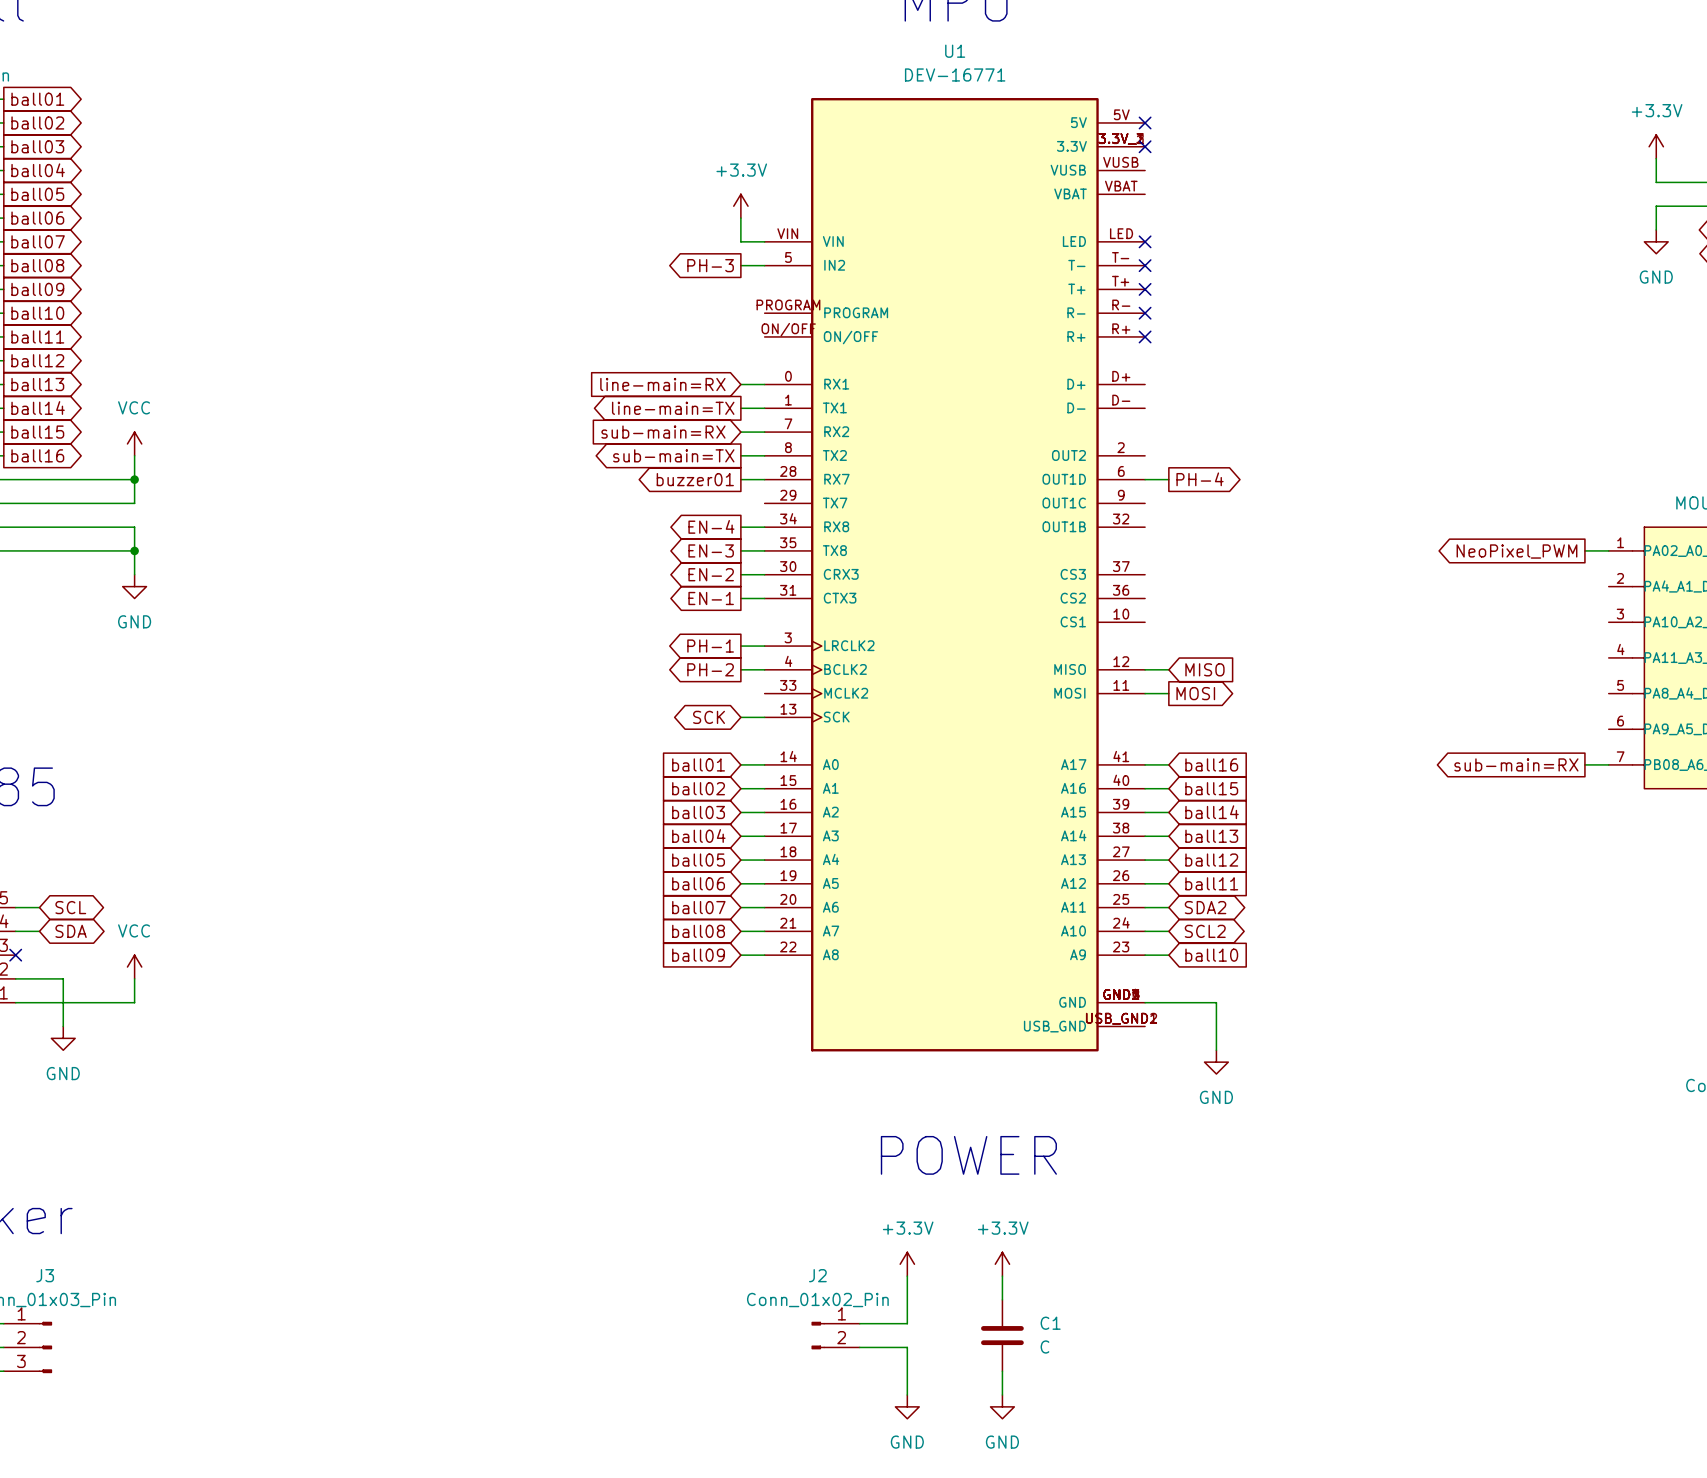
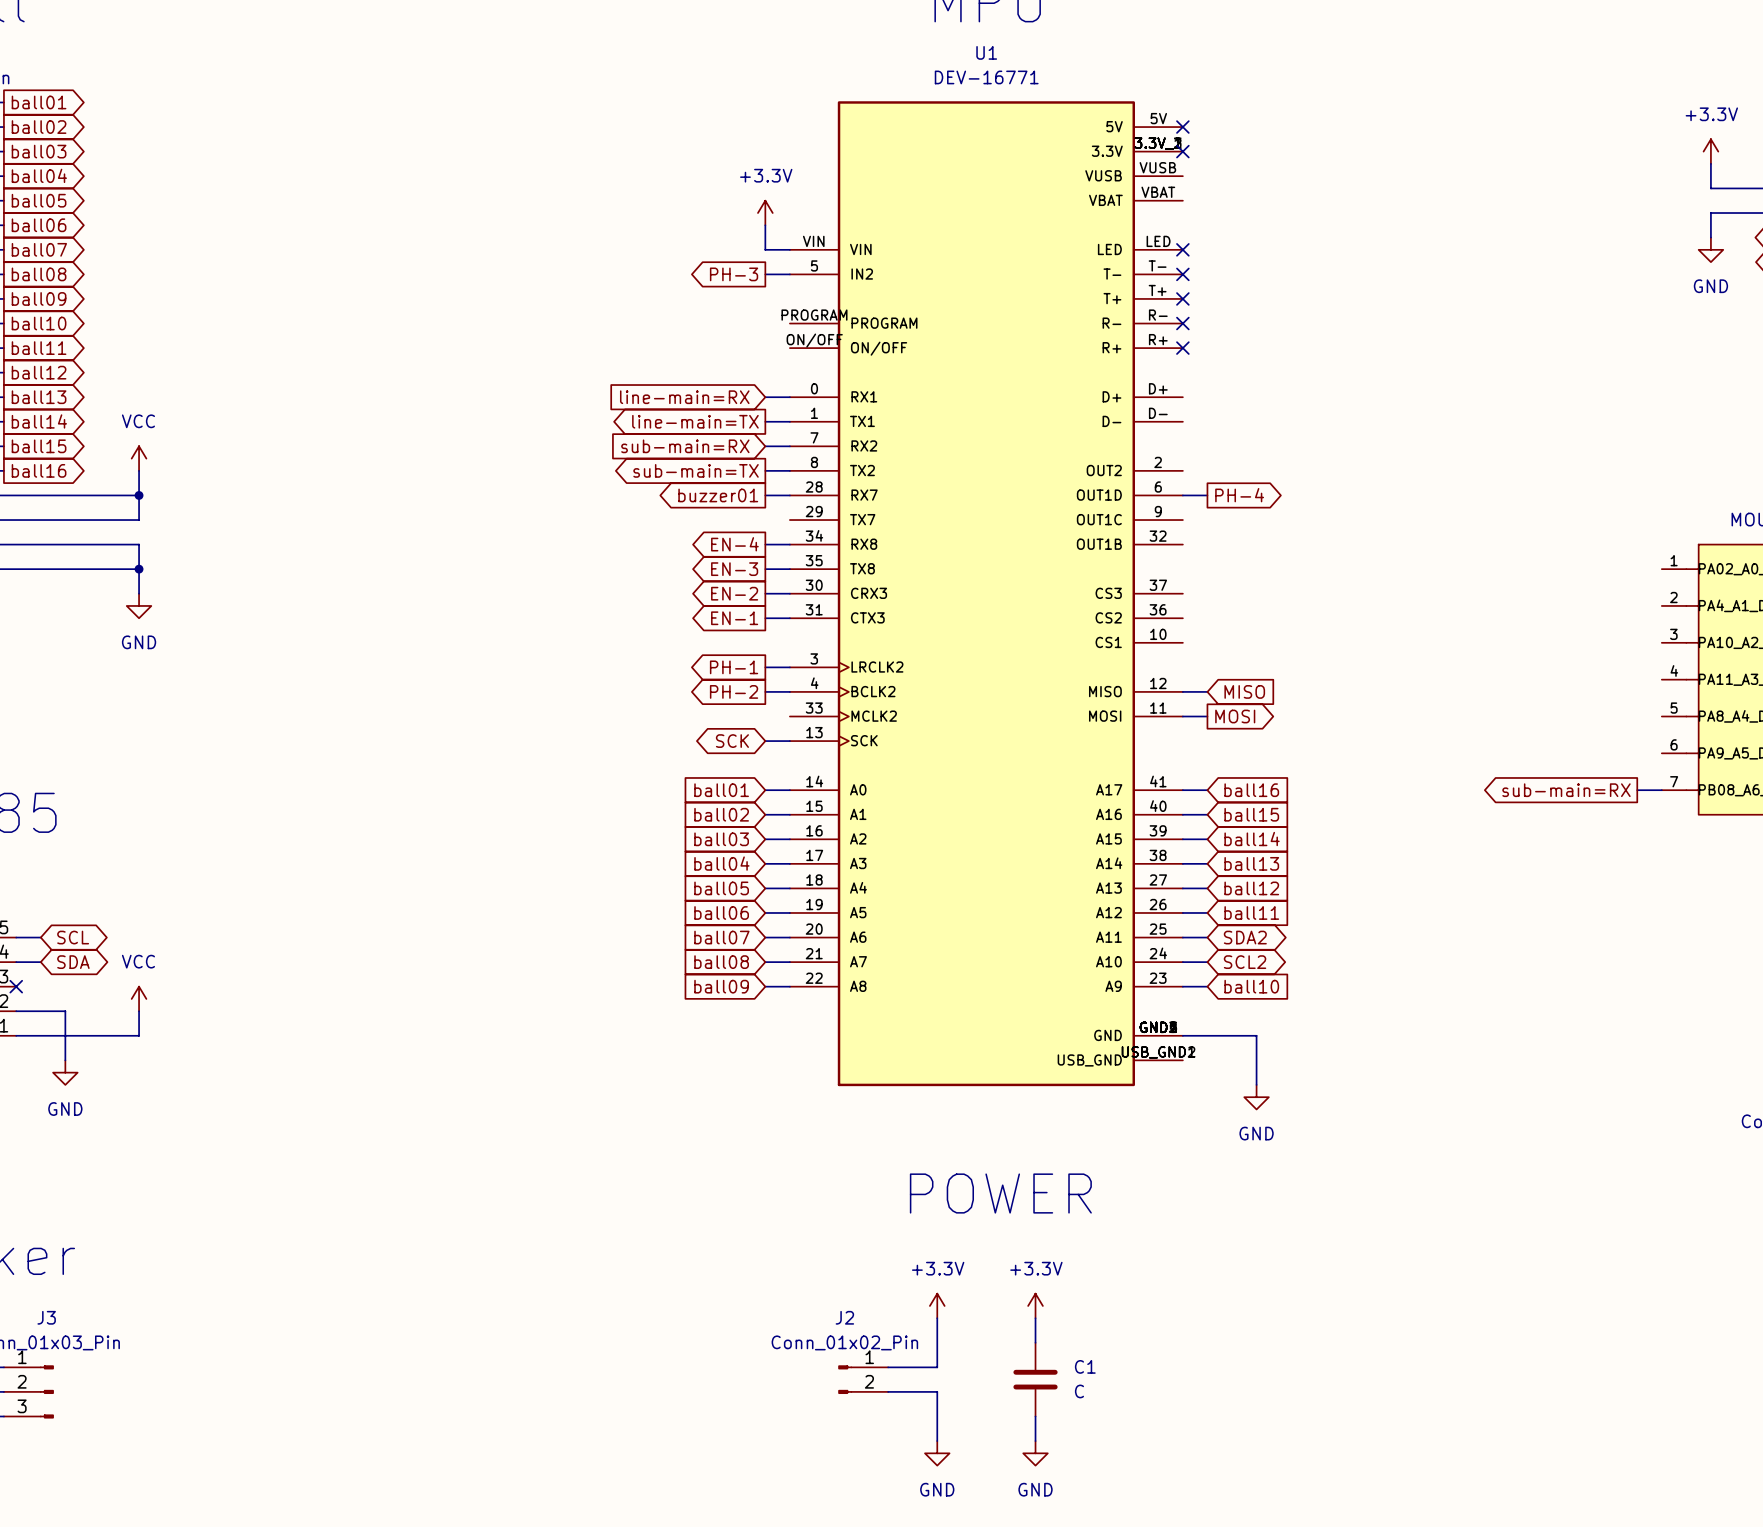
wire: (1584, 550) (1608, 550) -> none
global label: NeoPixel_PWM (1516, 551) -> none

